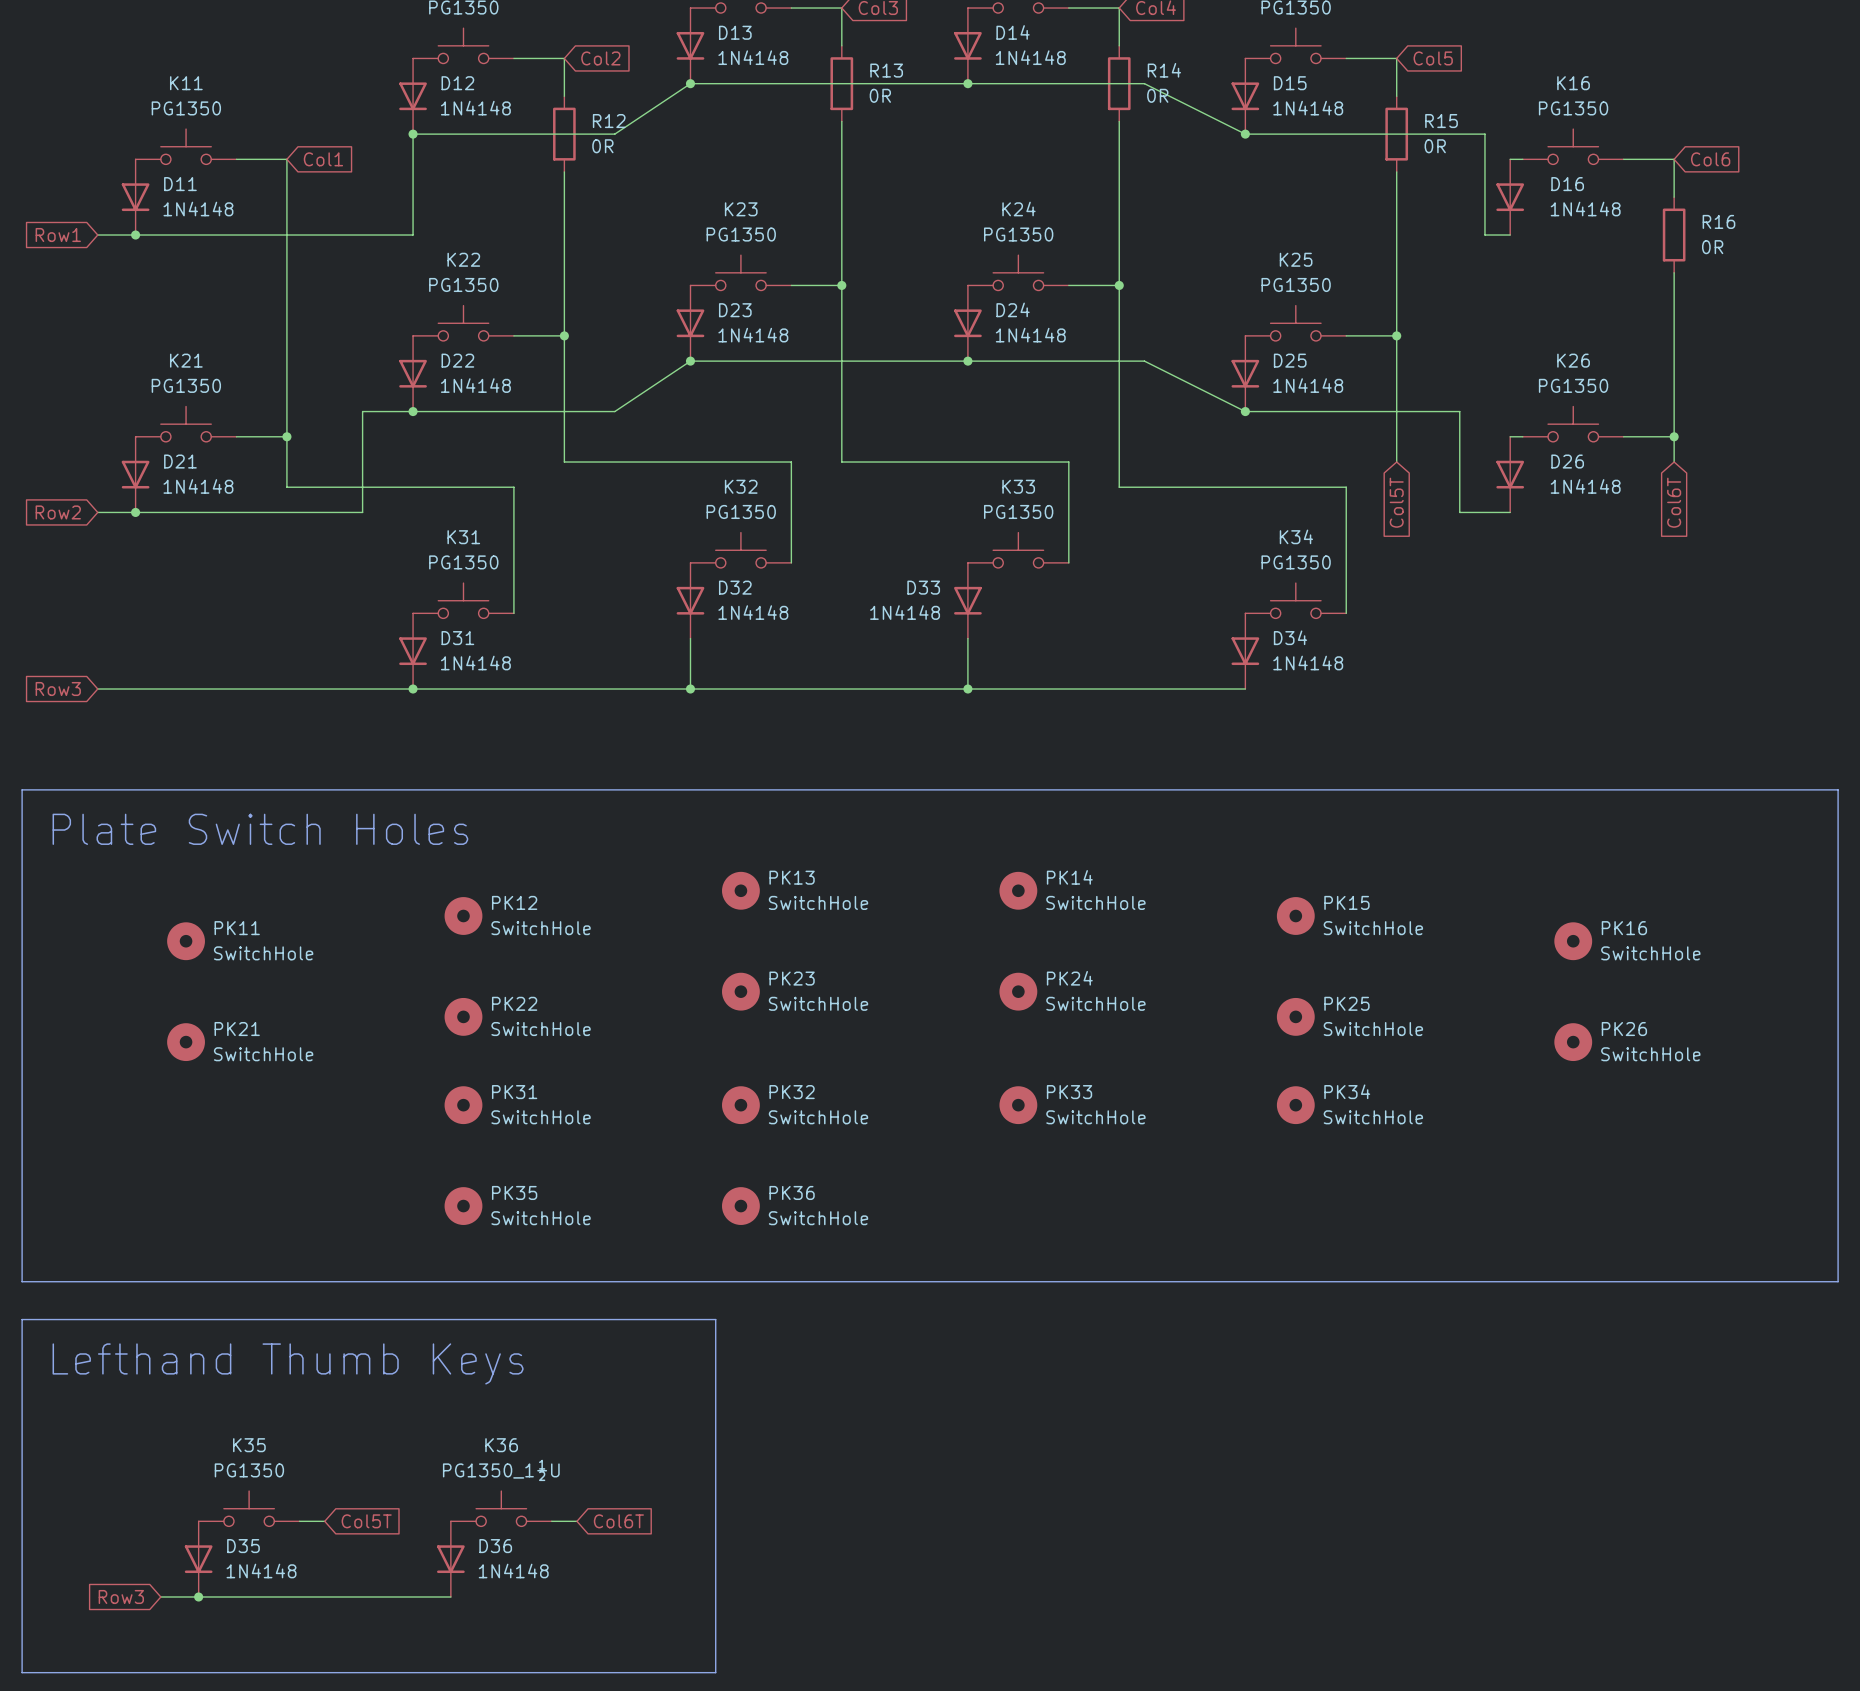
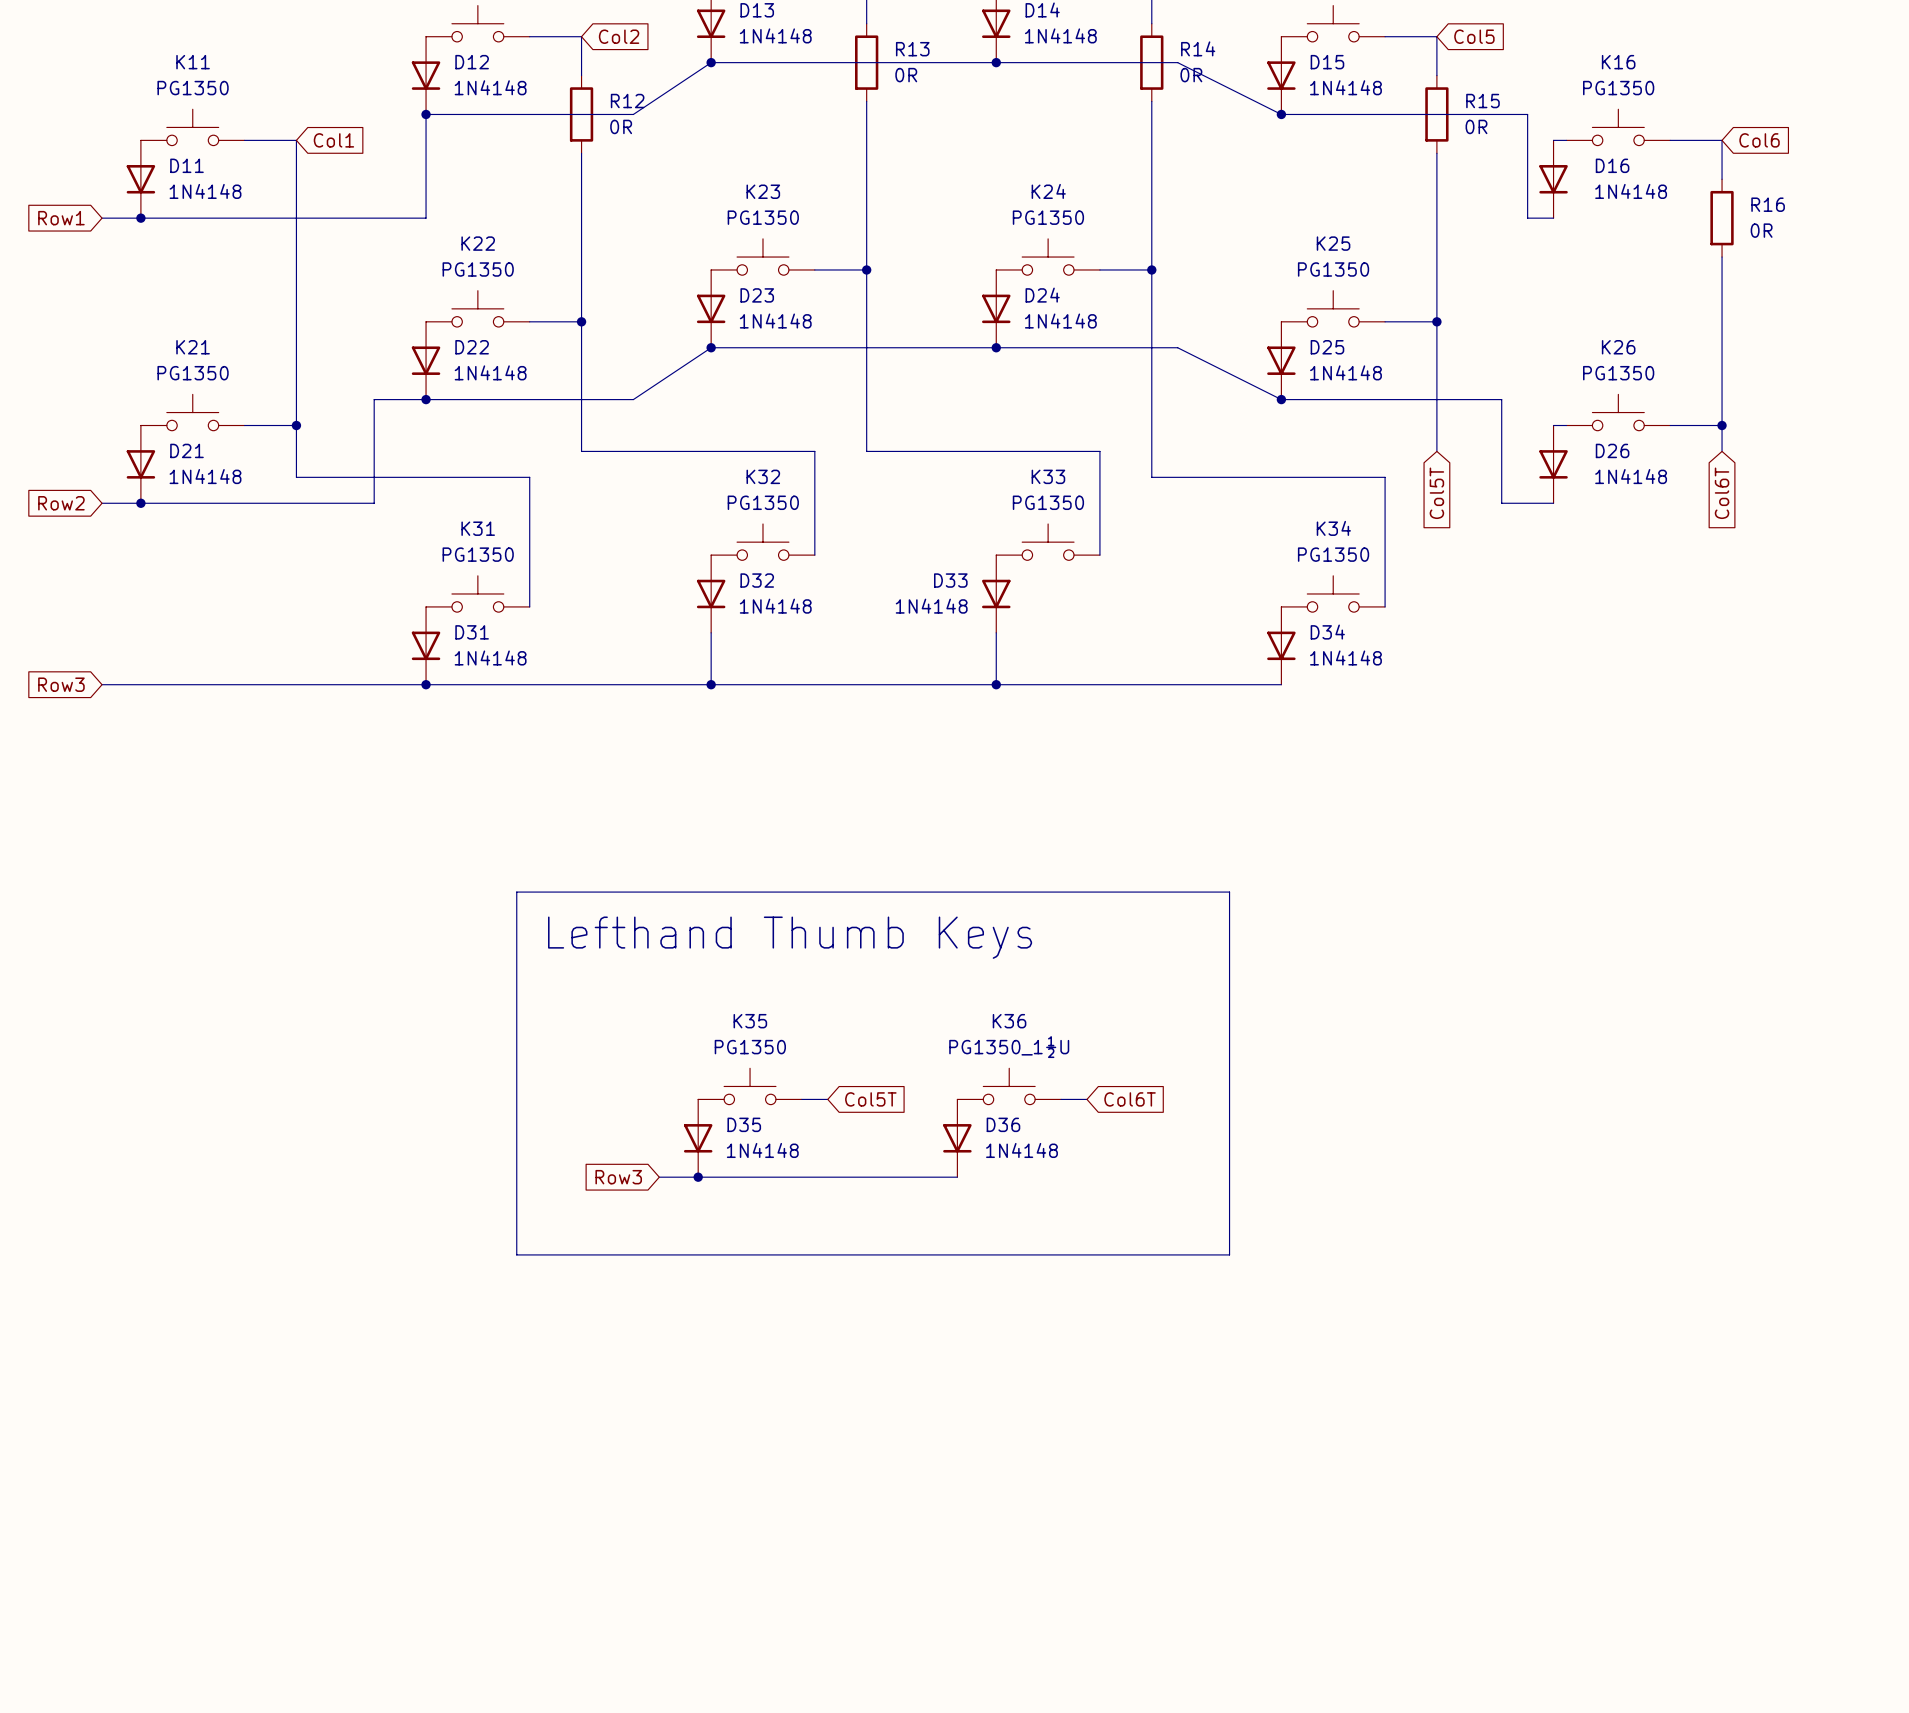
line: (22, 789) (22, 1281) (1838, 1281) (1838, 789) (22, 789) -> none
text: Plate Switch Holes (260, 829) -> none
line: none -> (516, 892) (1229, 892) (1229, 1254) (516, 1254) (516, 892)
PK13: SwitchHole (740, 890) -> none
PK14: SwitchHole (1018, 890) -> none
PK12: SwitchHole (463, 916) -> none
PK15: SwitchHole (1295, 916) -> none
text: none -> Lefthand Thumb Keys (790, 937)
PK11: SwitchHole (186, 941) -> none
PK16: SwitchHole (1573, 941) -> none
PK23: SwitchHole (740, 991) -> none
PK24: SwitchHole (1018, 991) -> none
PK22: SwitchHole (463, 1016) -> none
PK25: SwitchHole (1295, 1016) -> none
PK21: SwitchHole (186, 1042) -> none
PK26: SwitchHole (1573, 1042) -> none
wire: none -> (801, 1099) (827, 1099)
global label: none -> Col5T (870, 1099)
wire: none -> (1061, 1099) (1086, 1099)
global label: none -> Col6T (1130, 1099)
PK31: SwitchHole (463, 1105) -> none
PK32: SwitchHole (740, 1105) -> none
PK33: SwitchHole (1018, 1105) -> none
PK34: SwitchHole (1295, 1105) -> none
global label: none -> Row3 (618, 1177)
wire: none -> (659, 1177) (957, 1177)
junction: none -> (698, 1177)
PK35: SwitchHole (463, 1206) -> none
PK36: SwitchHole (740, 1206) -> none
line: (22, 1319) (715, 1319) (715, 1672) (22, 1672) (22, 1319) -> none
text: Lefthand Thumb Keys (288, 1363) -> none
K35 position: (249, 1508) -> (750, 1086)
K36 position: (501, 1508) -> (1009, 1086)
wire: (299, 1521) (324, 1521) -> none
global label: Col5T (366, 1521) -> none
wire: (551, 1521) (576, 1521) -> none
global label: Col6T (618, 1521) -> none
D35 position: (198, 1559) -> (698, 1138)
D36 position: (450, 1559) -> (957, 1138)
global label: Row3 (121, 1596) -> none
wire: (160, 1596) (450, 1596) -> none
junction: (198, 1596) -> none

